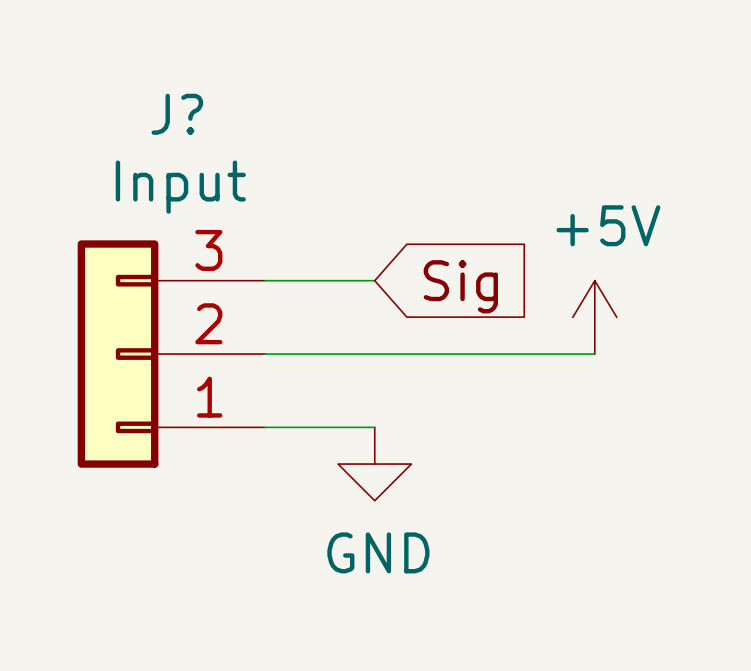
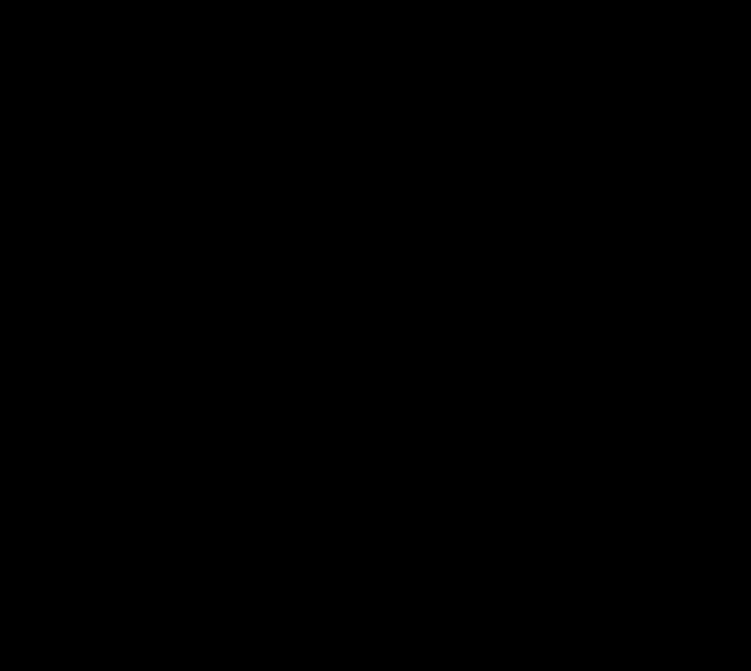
wire: (264, 280) (374, 280) -> none
global label: Sig (460, 286) -> none
power symbol: +5V (594, 317) -> none
J?: Input (171, 354) -> none
wire: (264, 354) (594, 354) -> none
wire: (264, 427) (374, 427) -> none
power symbol: GND (374, 464) -> none

